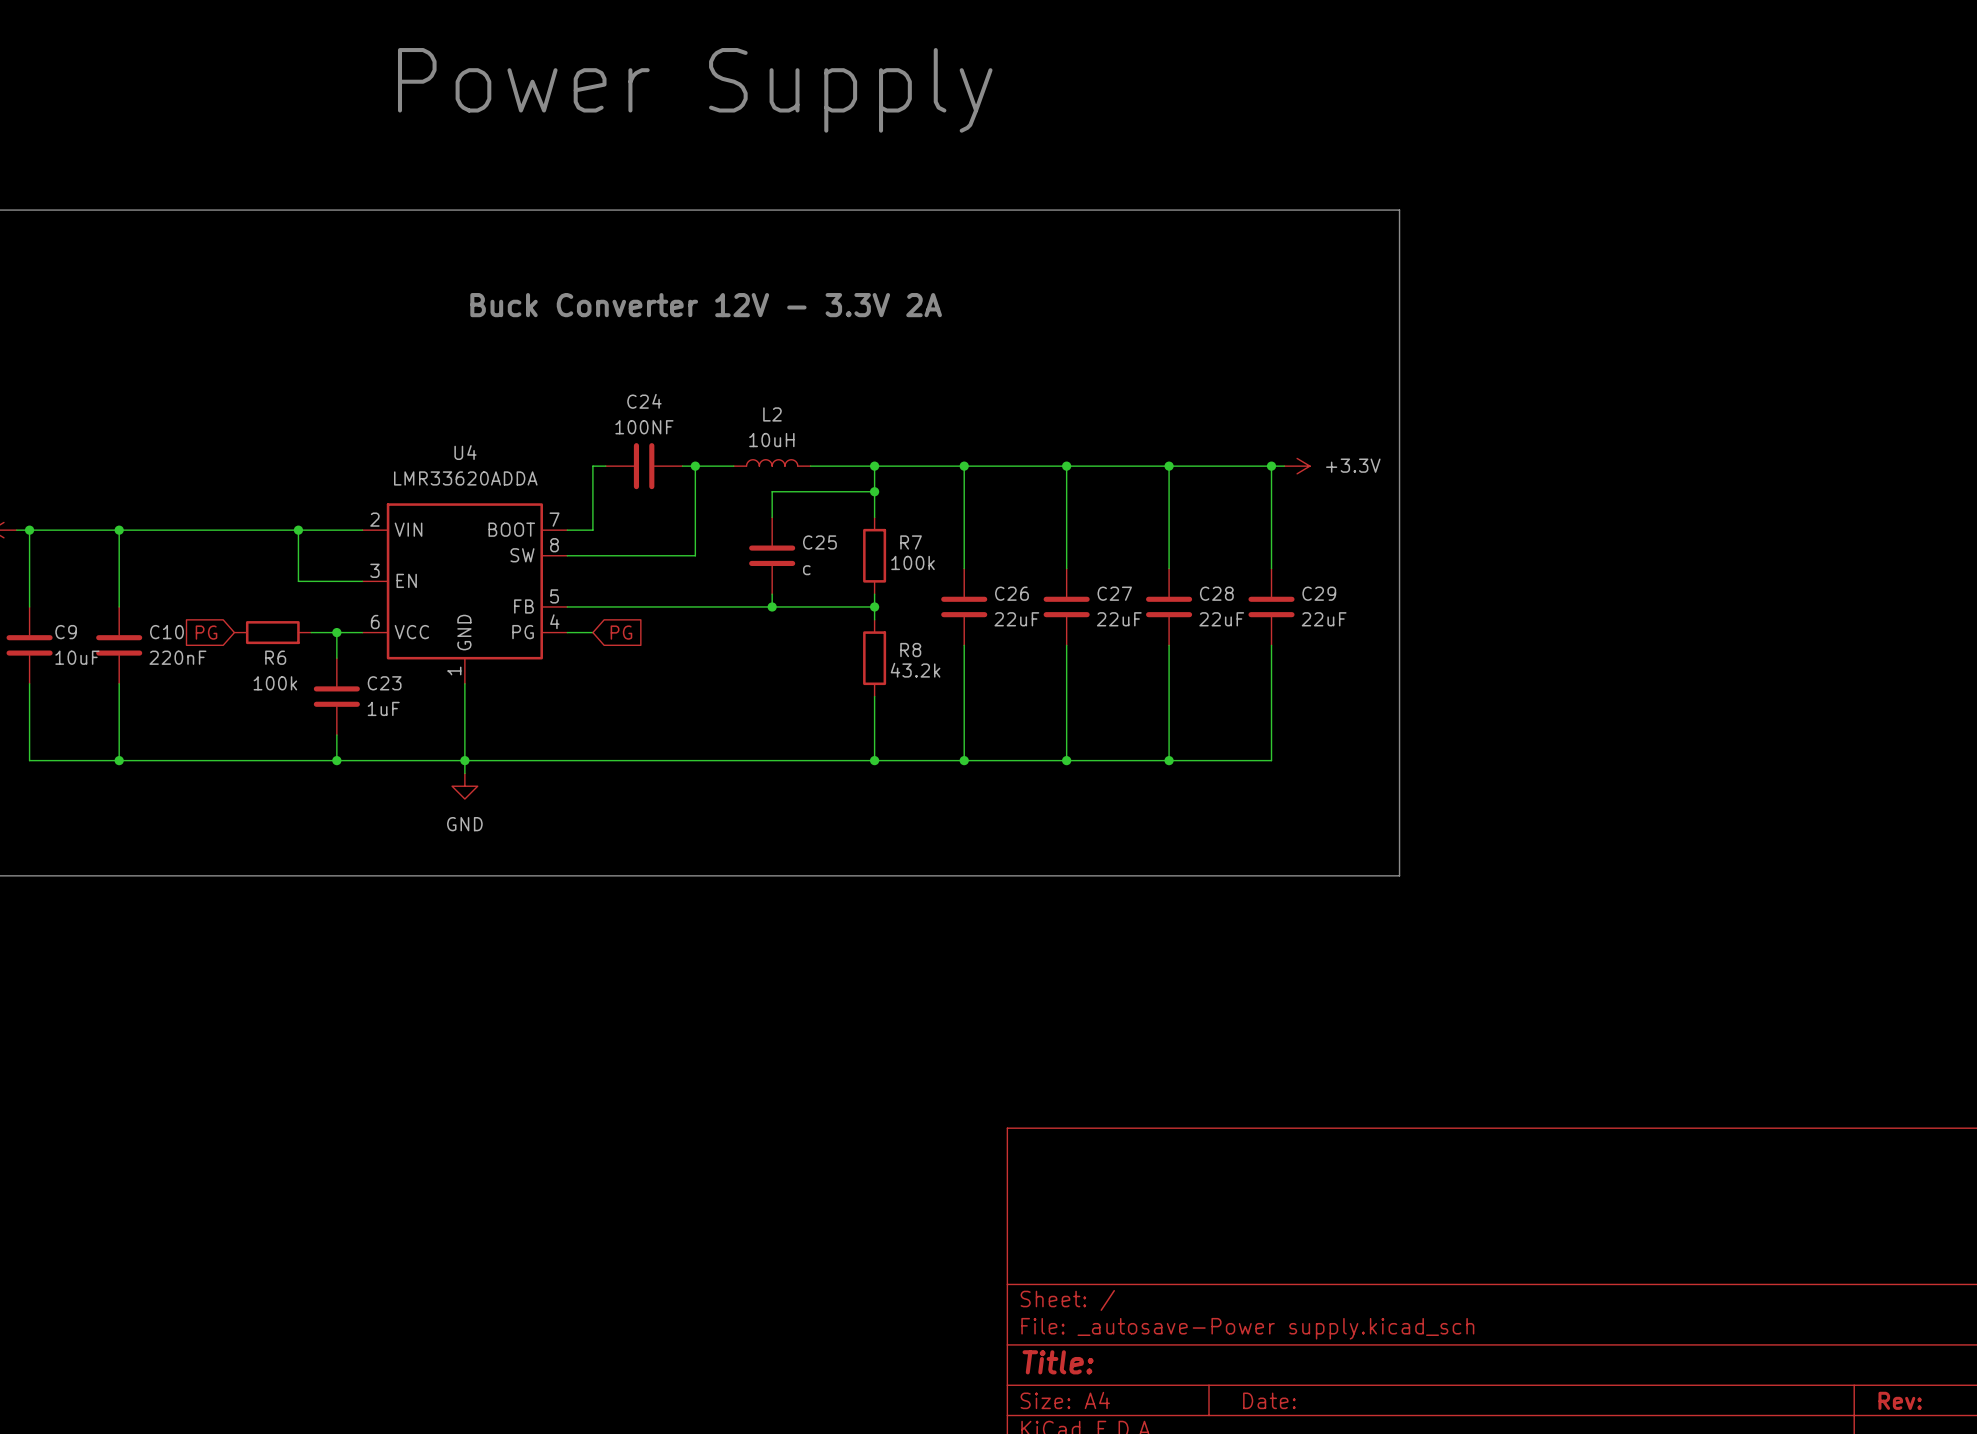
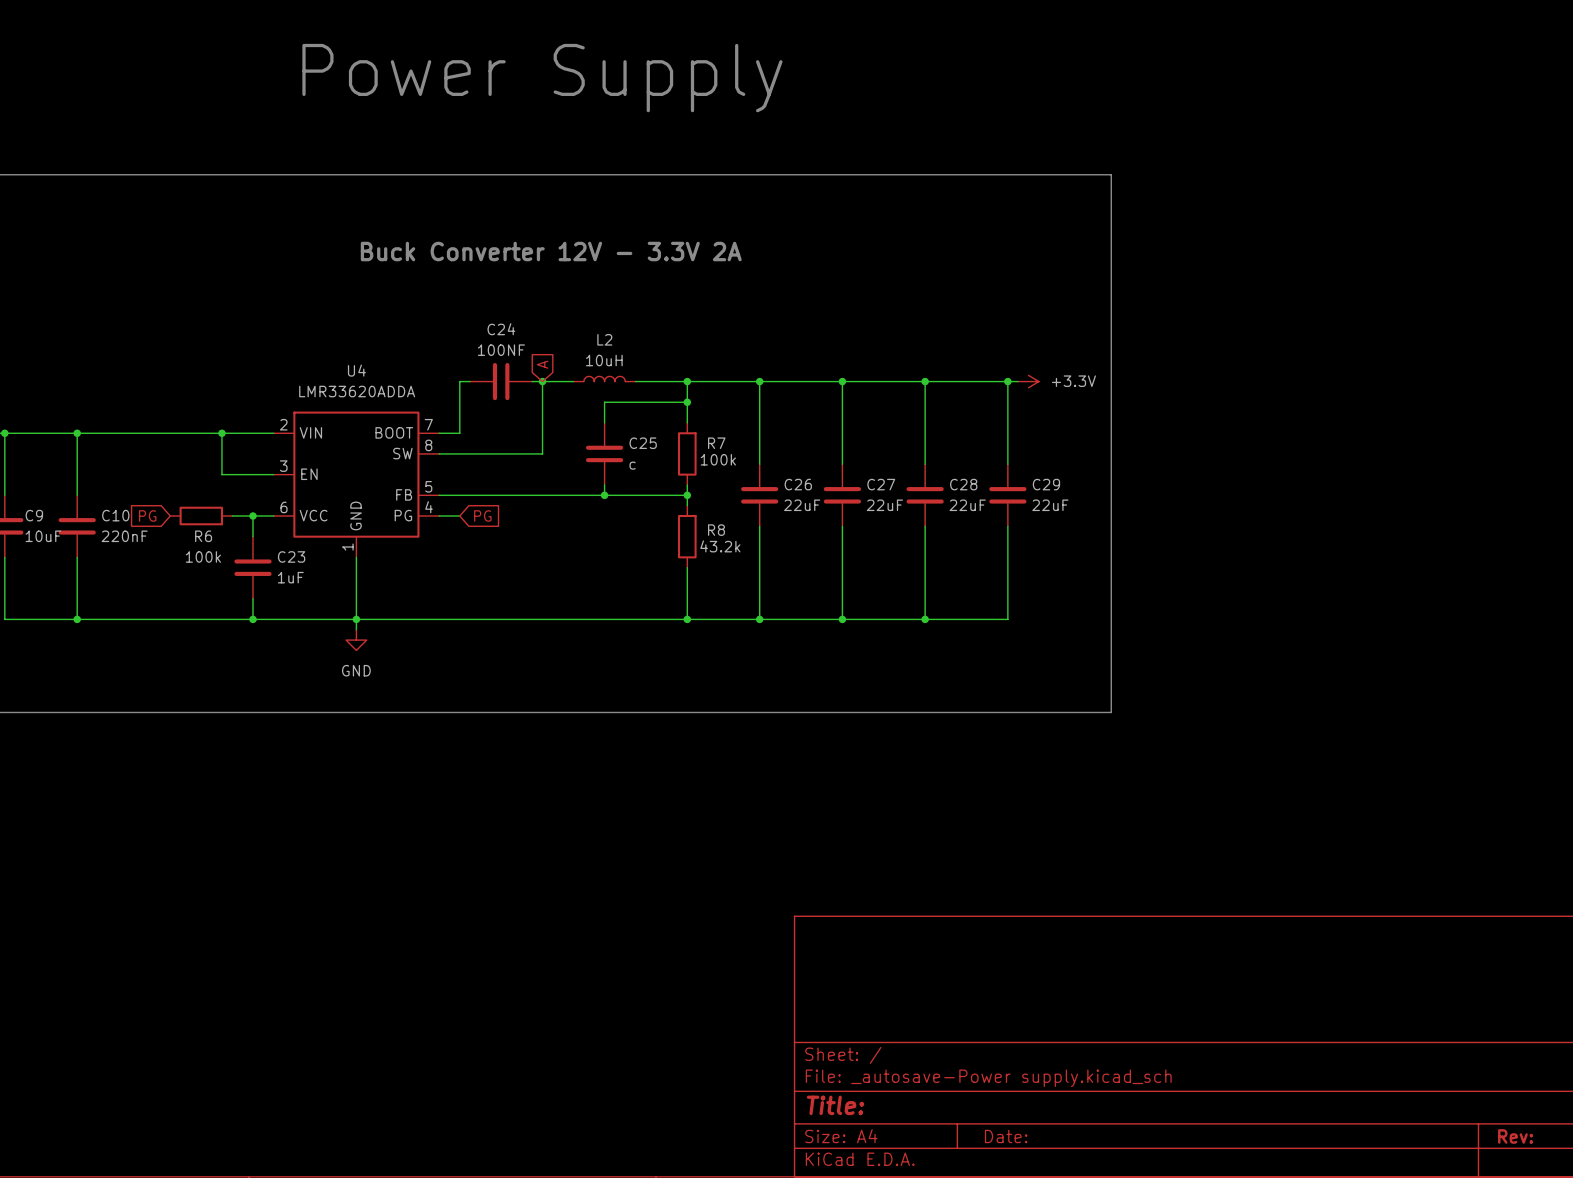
global label: none -> A (542, 364)

